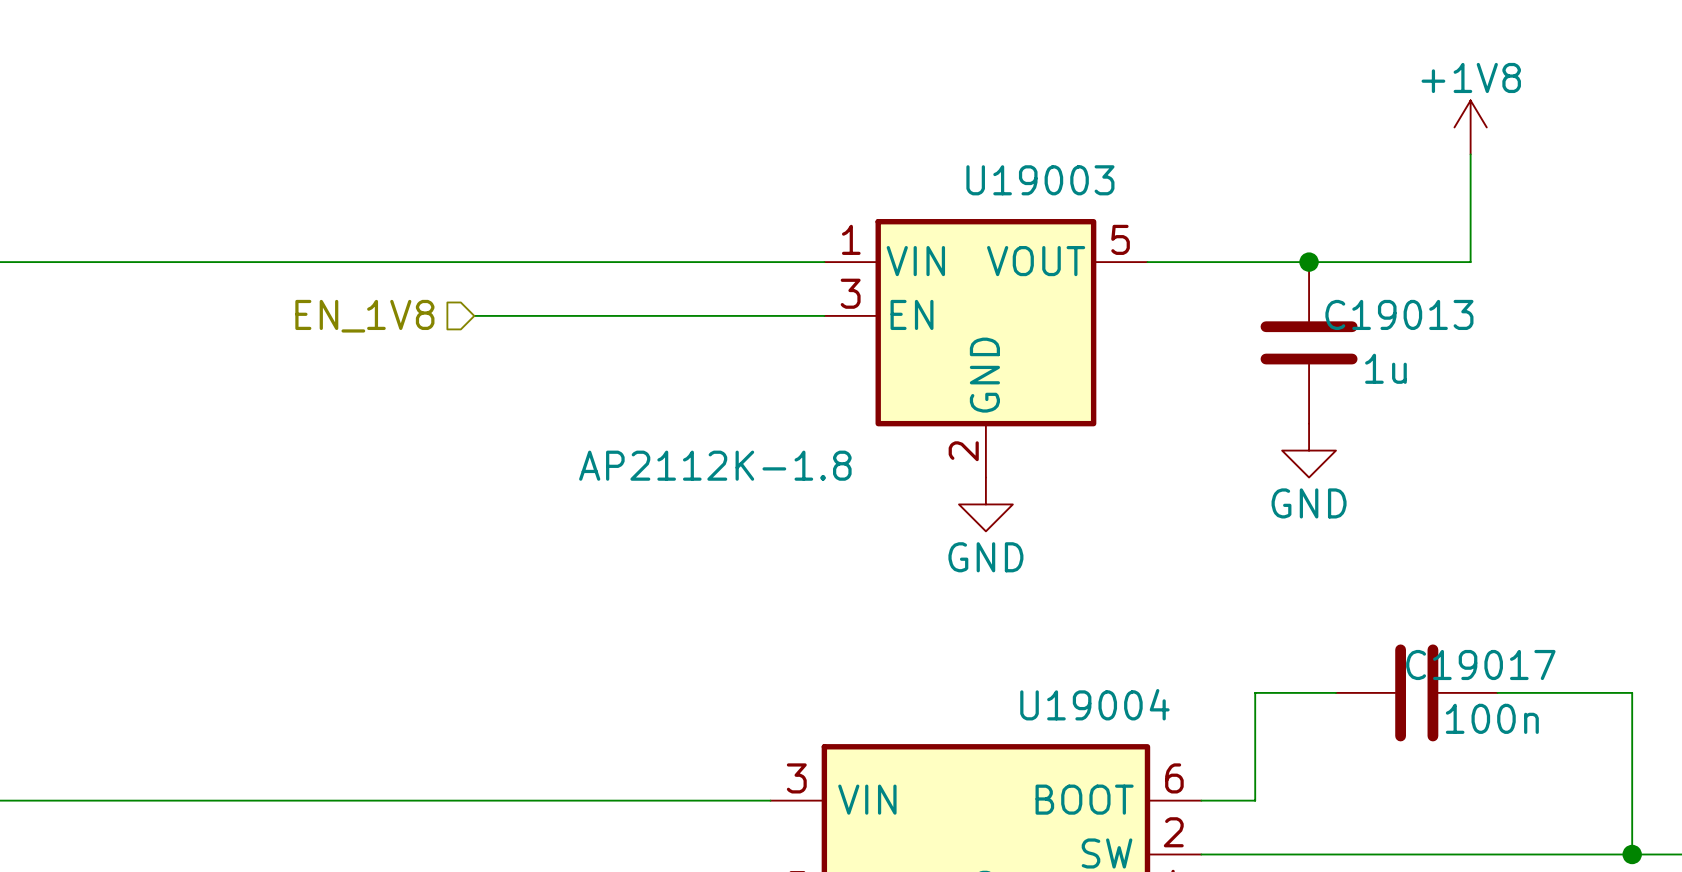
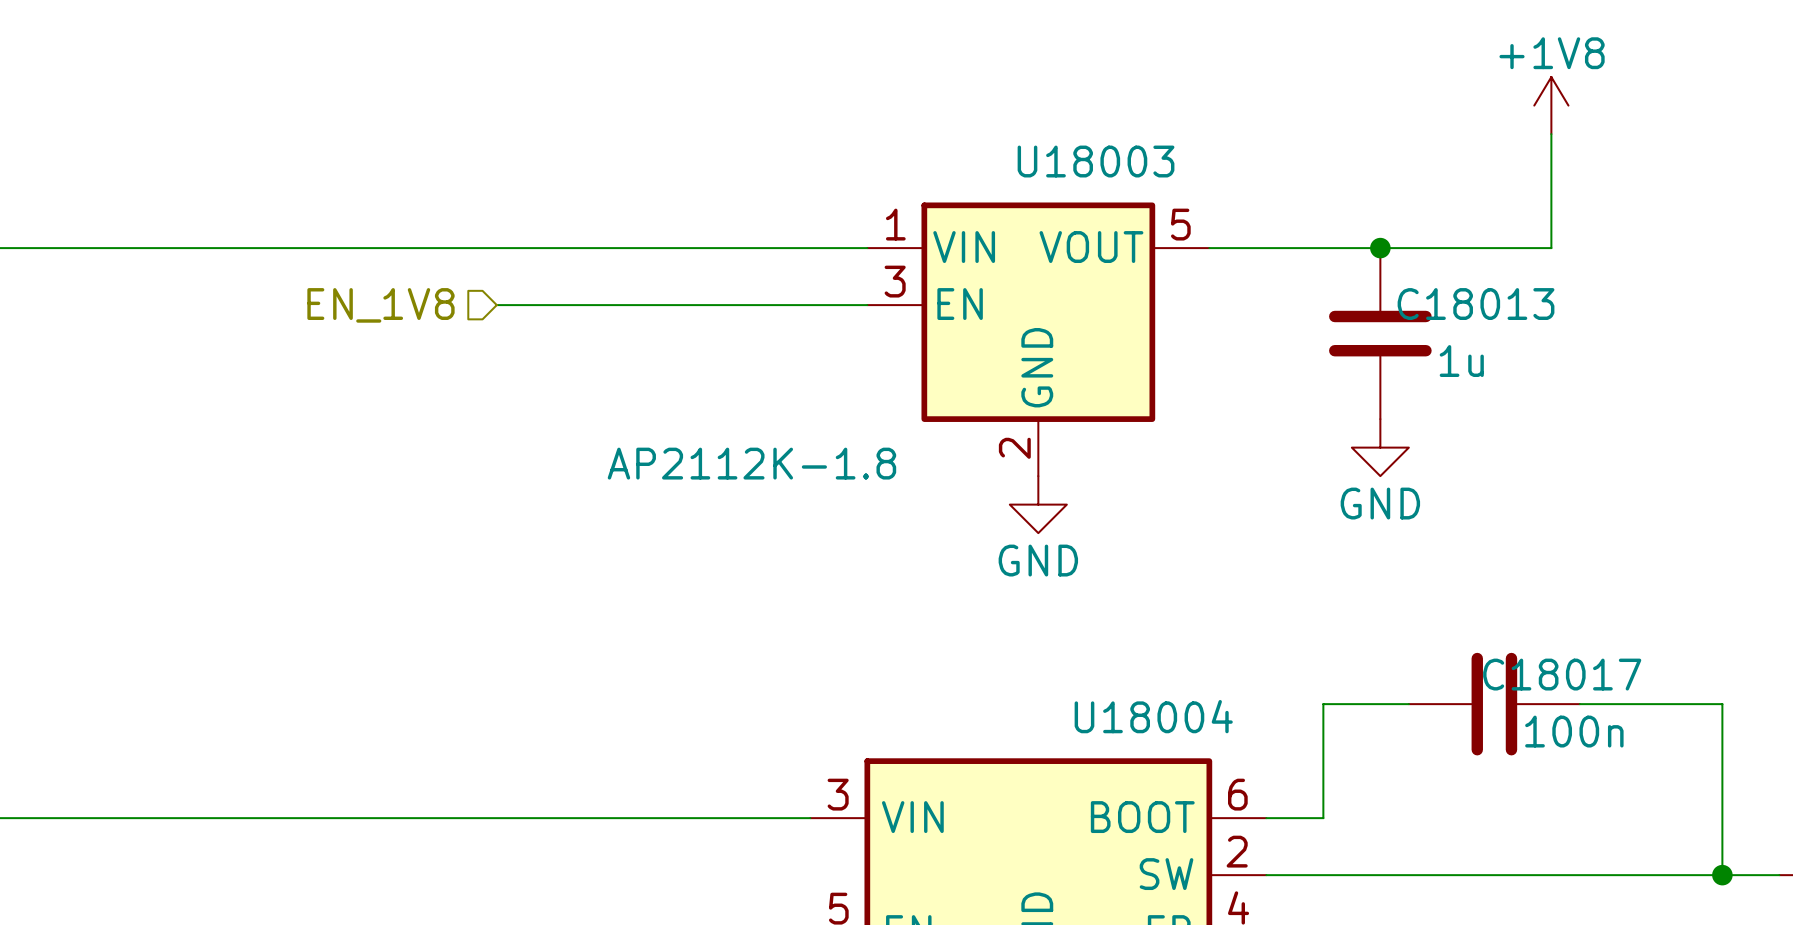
U19003 name: U19003 (1040, 180) -> U18003 (1096, 161)
C19013 name: C19013 (1399, 314) -> C18013 (1476, 304)
C19017 name: C19017 (1480, 664) -> C18017 (1562, 674)
U19004 name: U19004 (1094, 704) -> U18004 (1153, 716)

